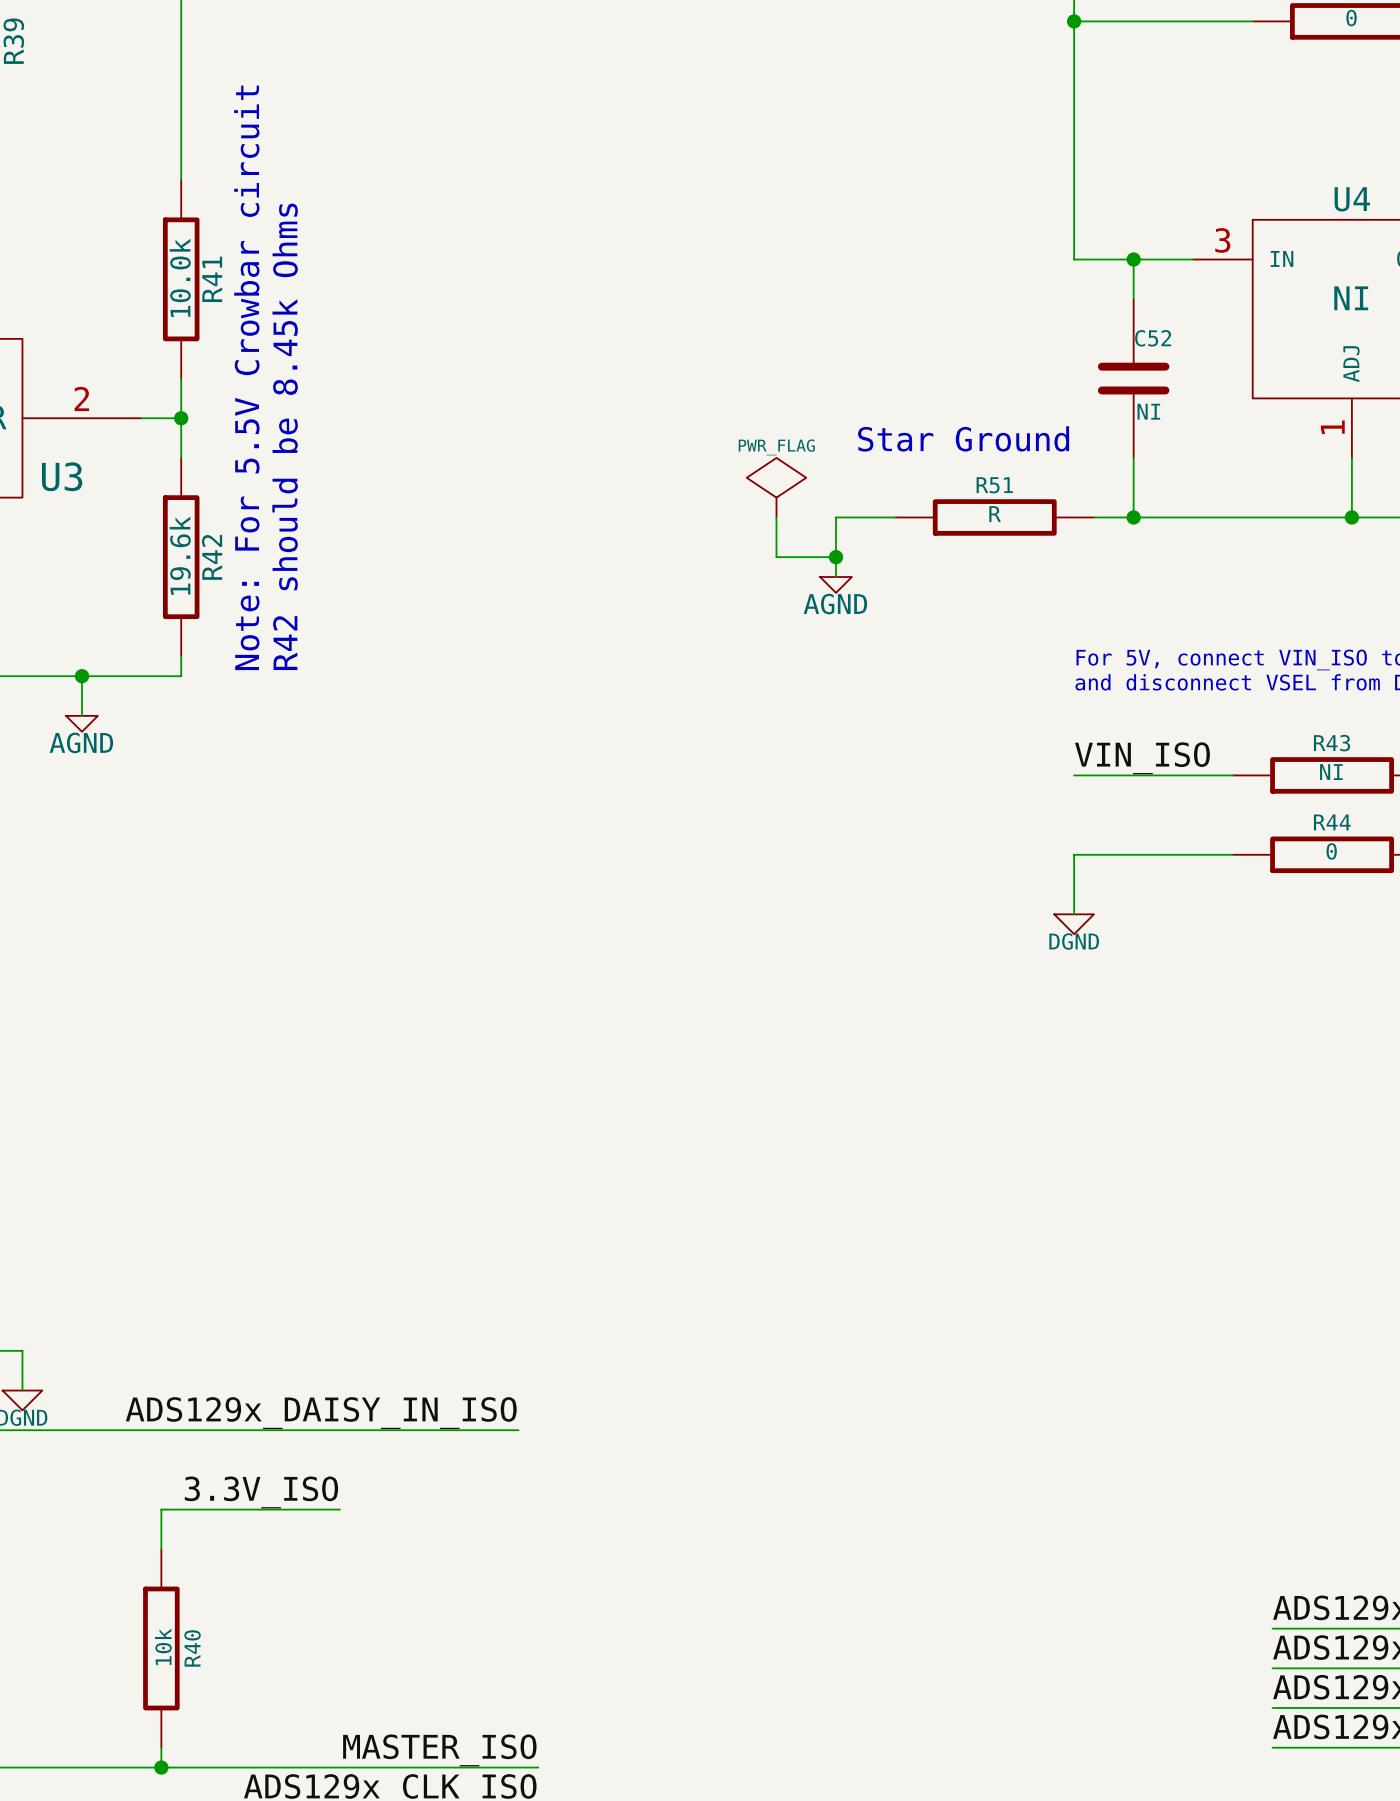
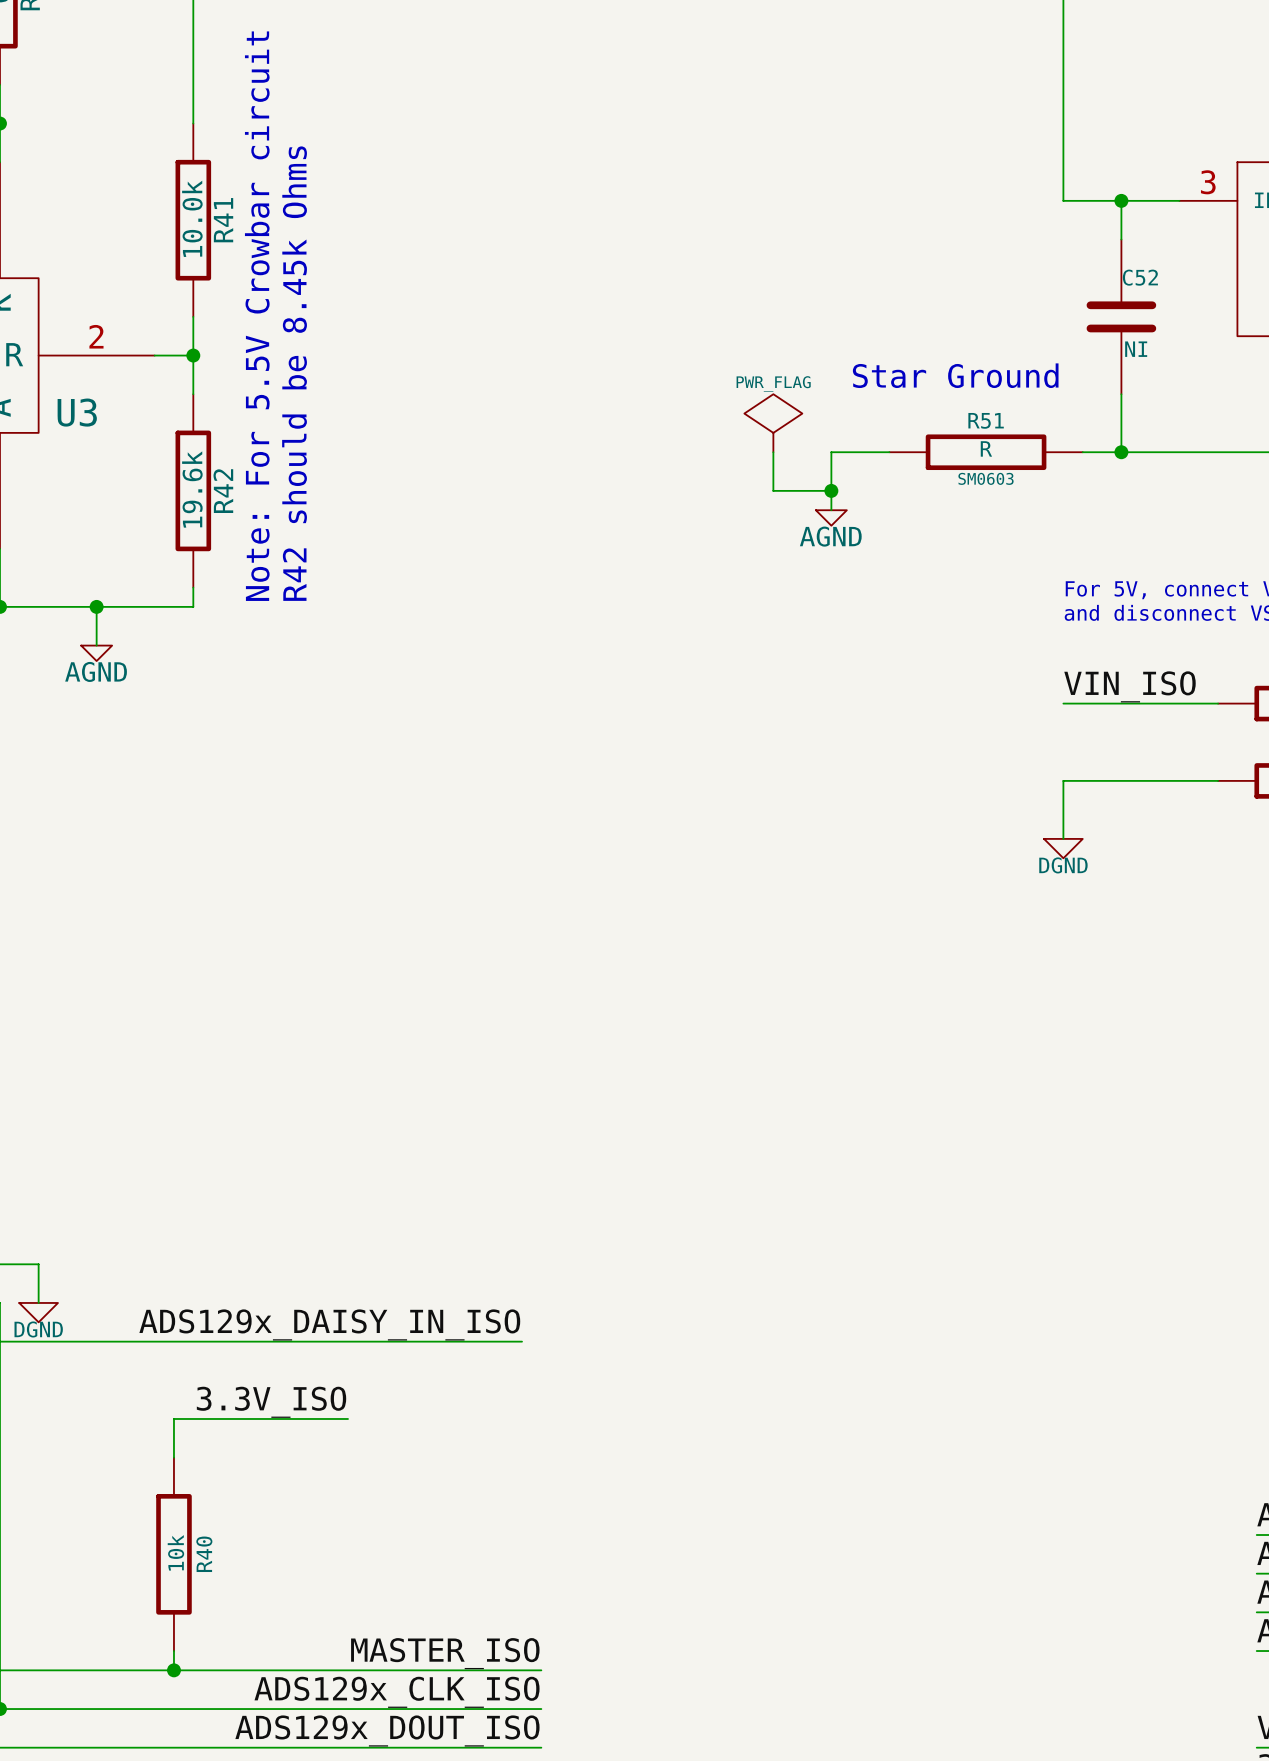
R51 text: none -> SM0603 (986, 478)

